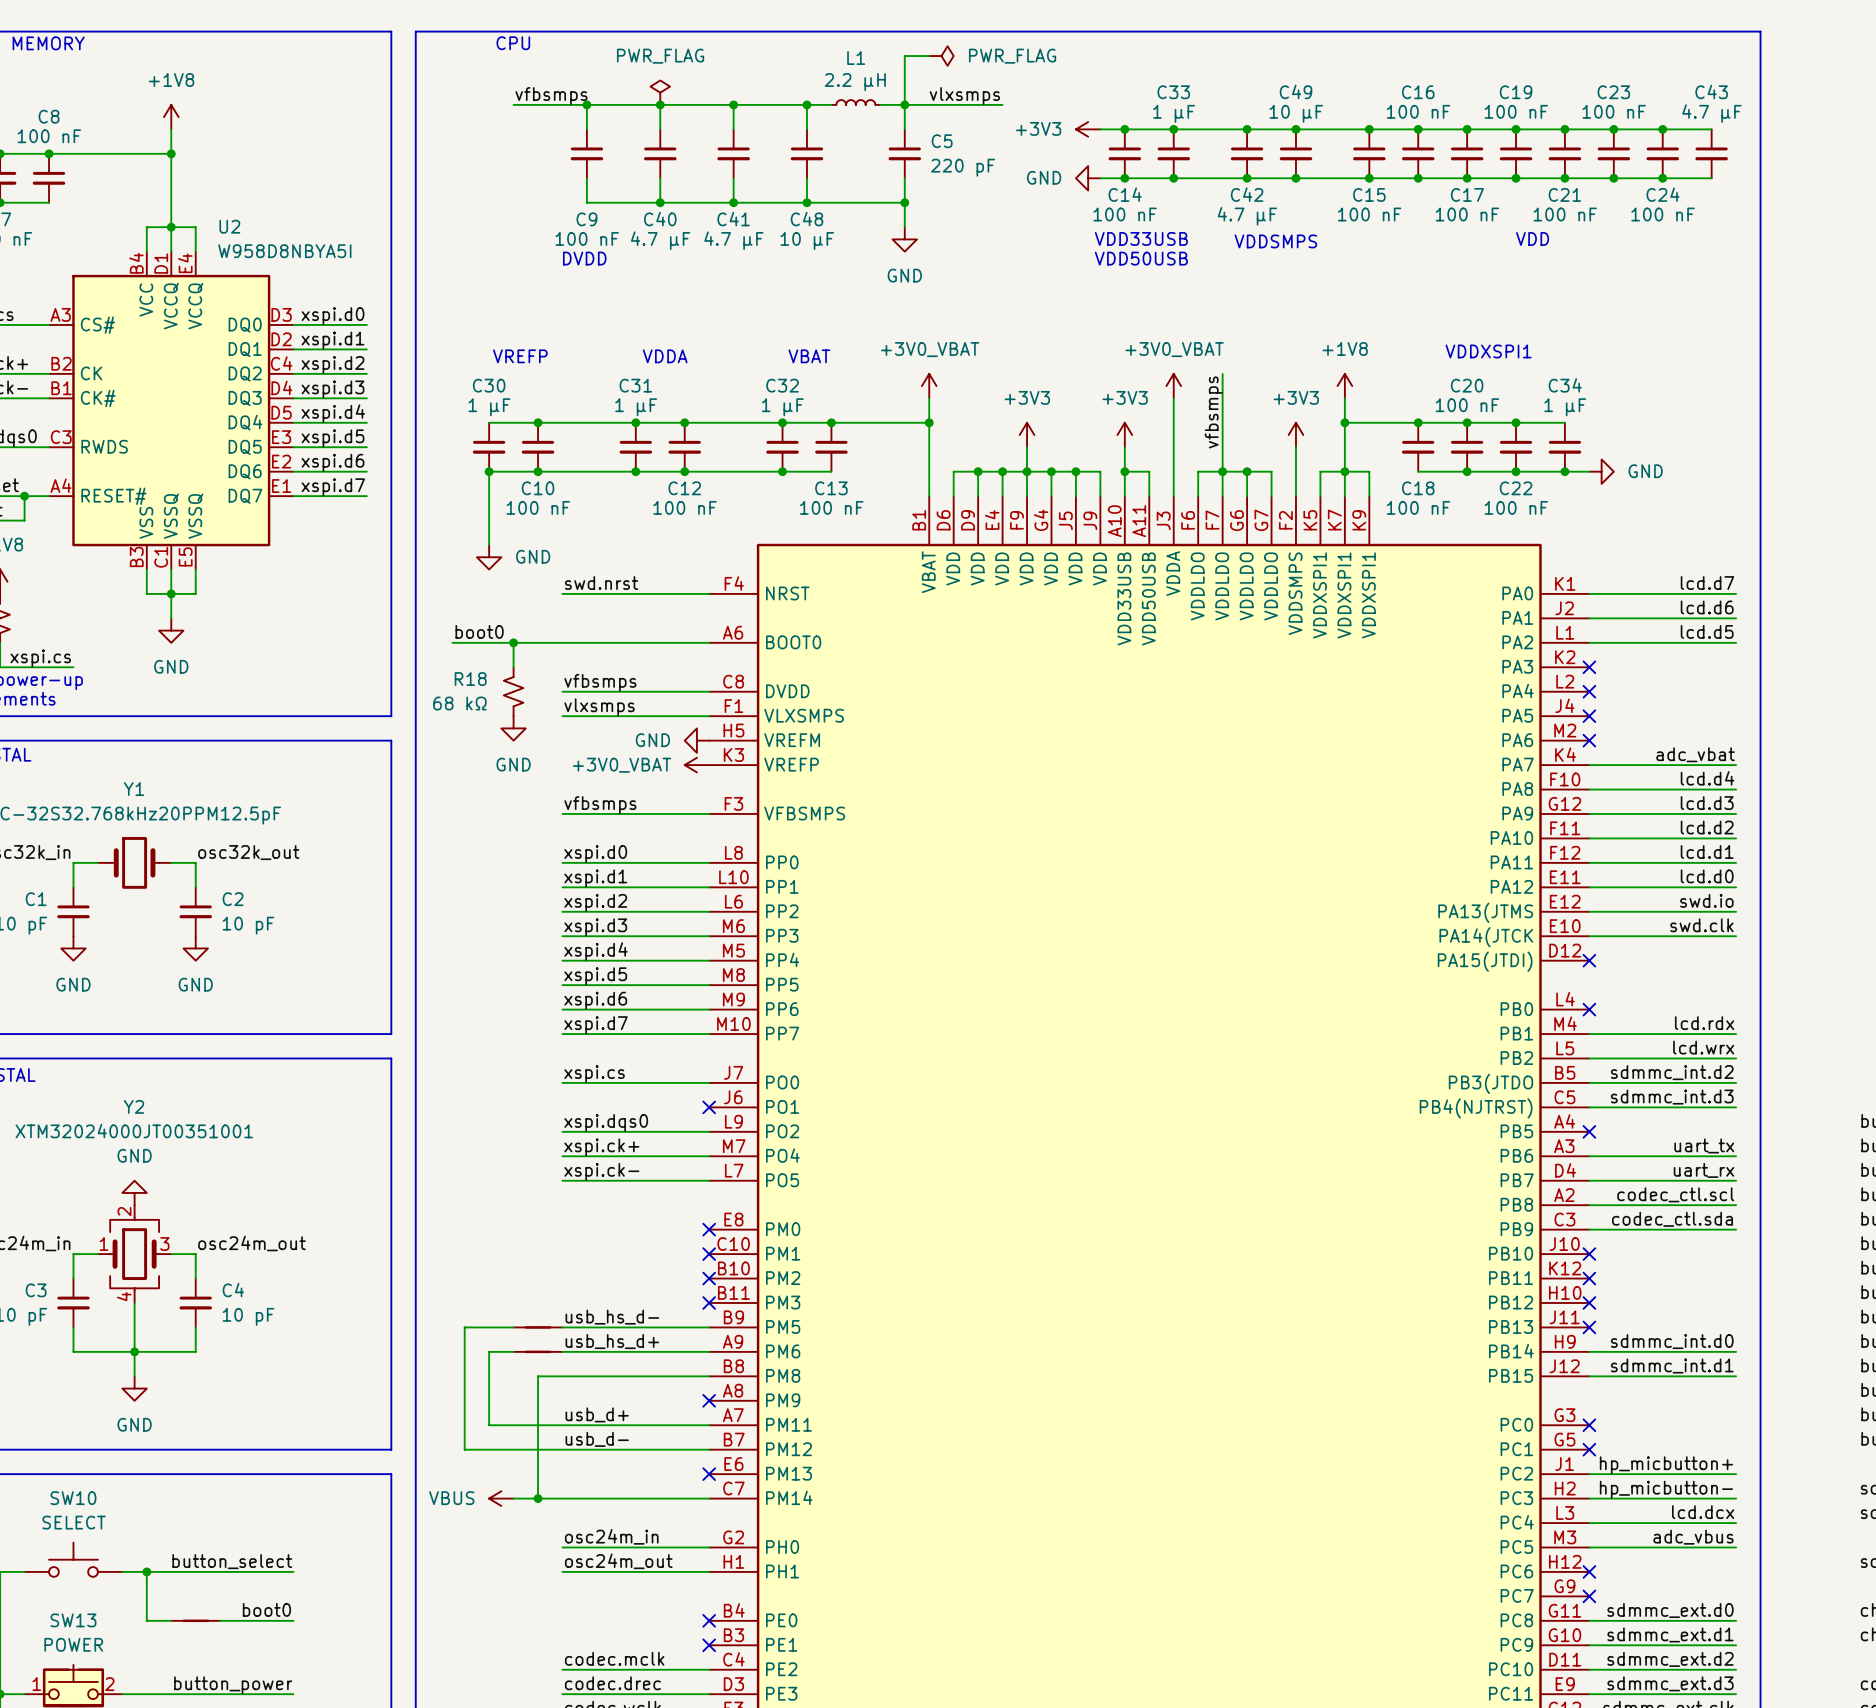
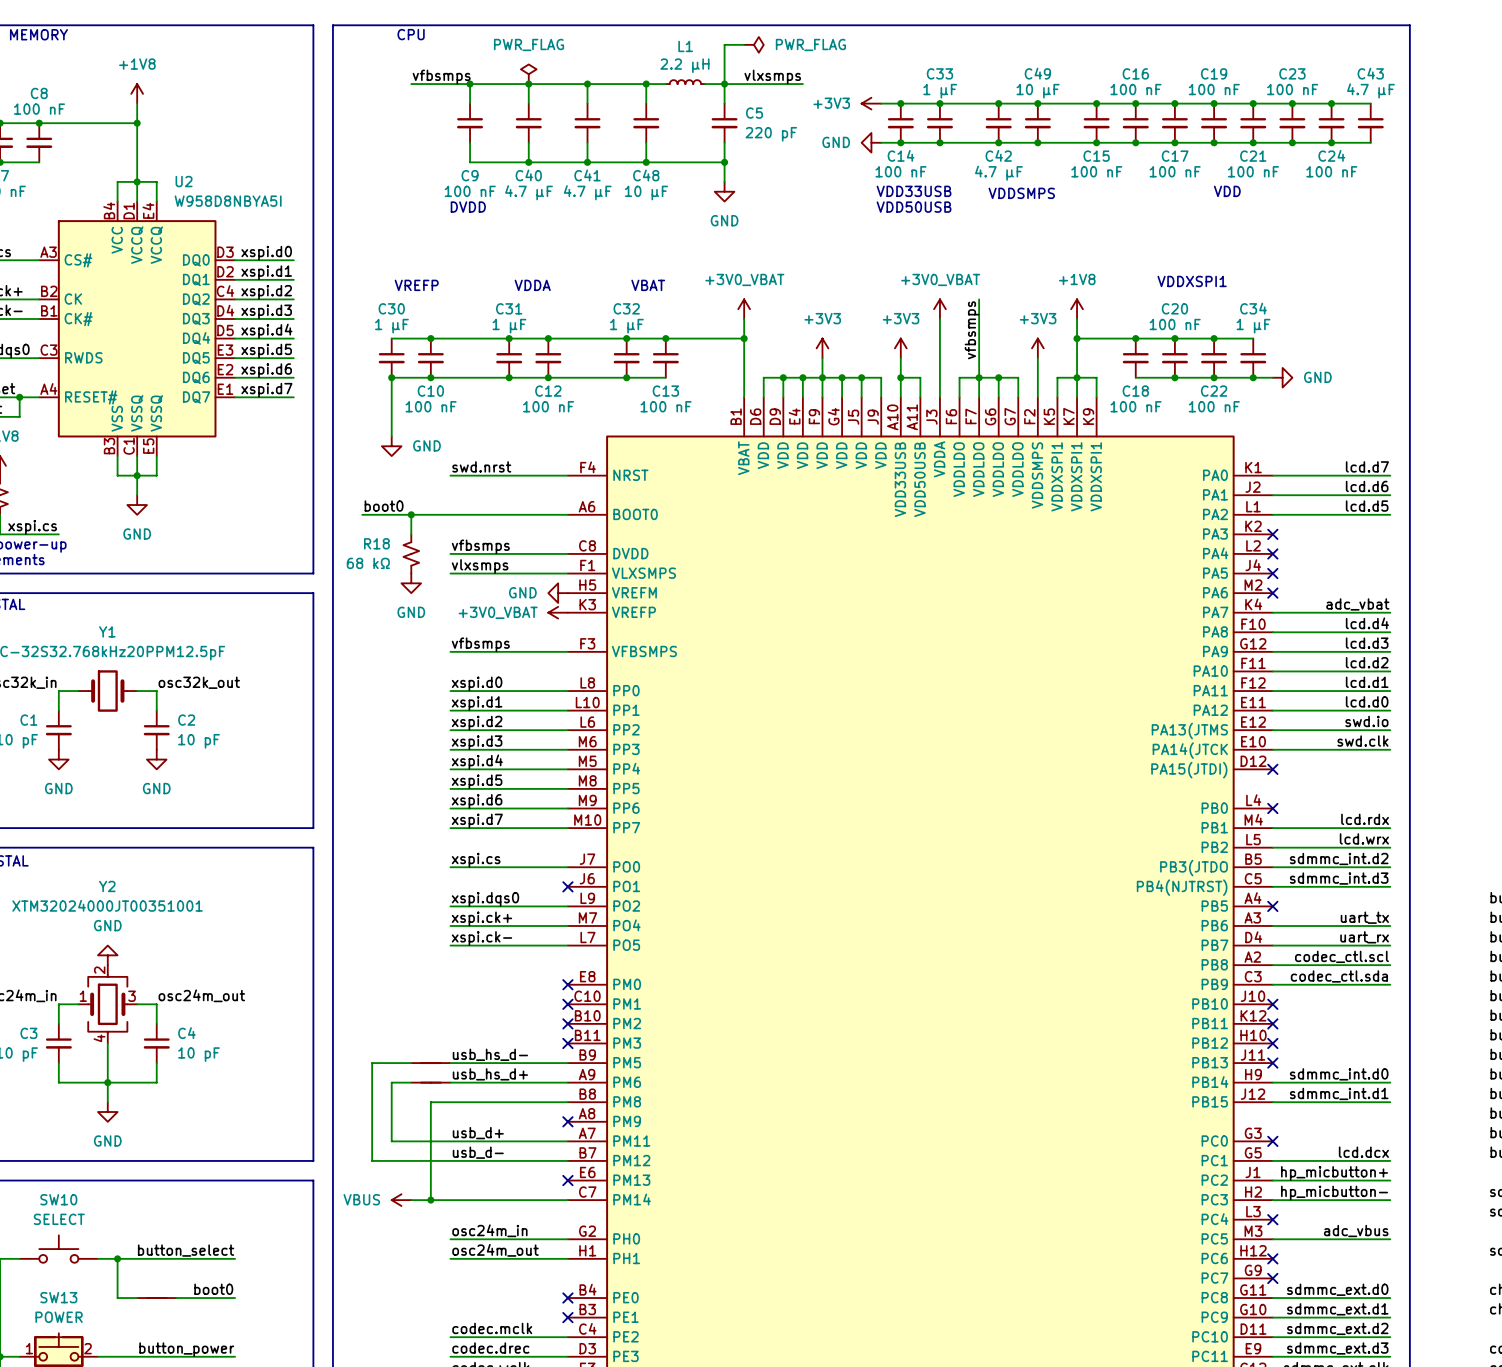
no-connect mark: (1589, 1449) -> none
label position: lcd.dcx (1703, 1512) -> lcd.dcx (1363, 1152)
wire: (1589, 1523) (1736, 1523) -> (1272, 1160) (1390, 1160)
no-connect mark: none -> (1272, 1219)

